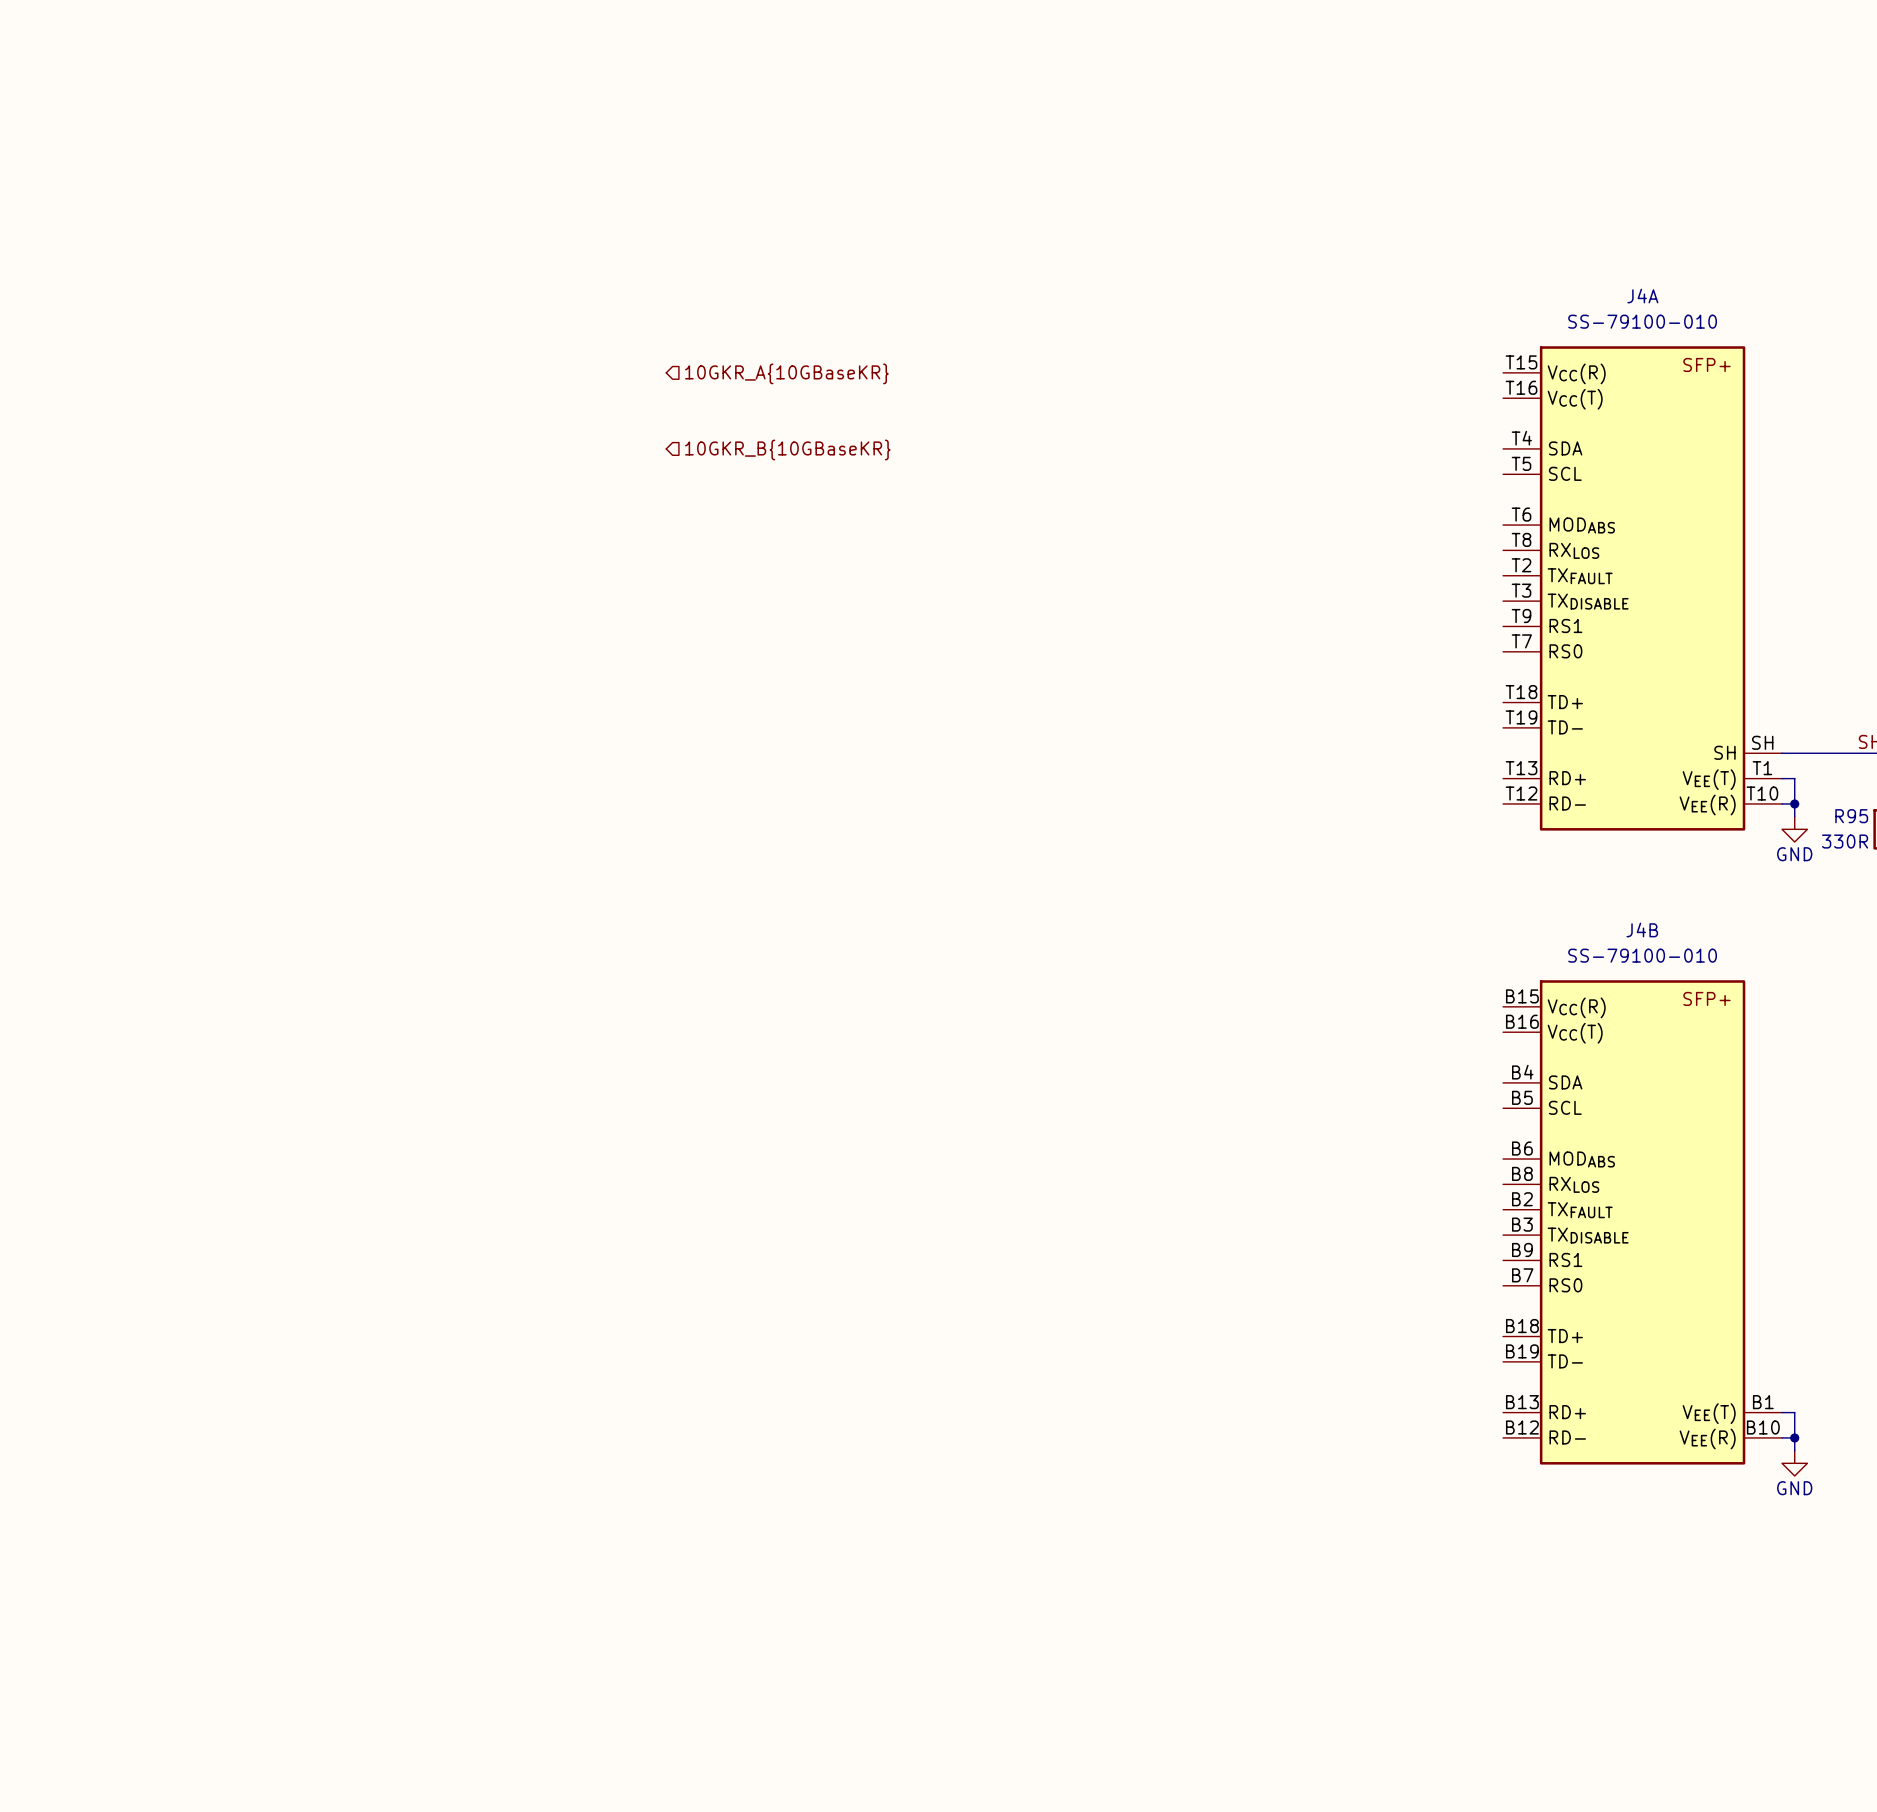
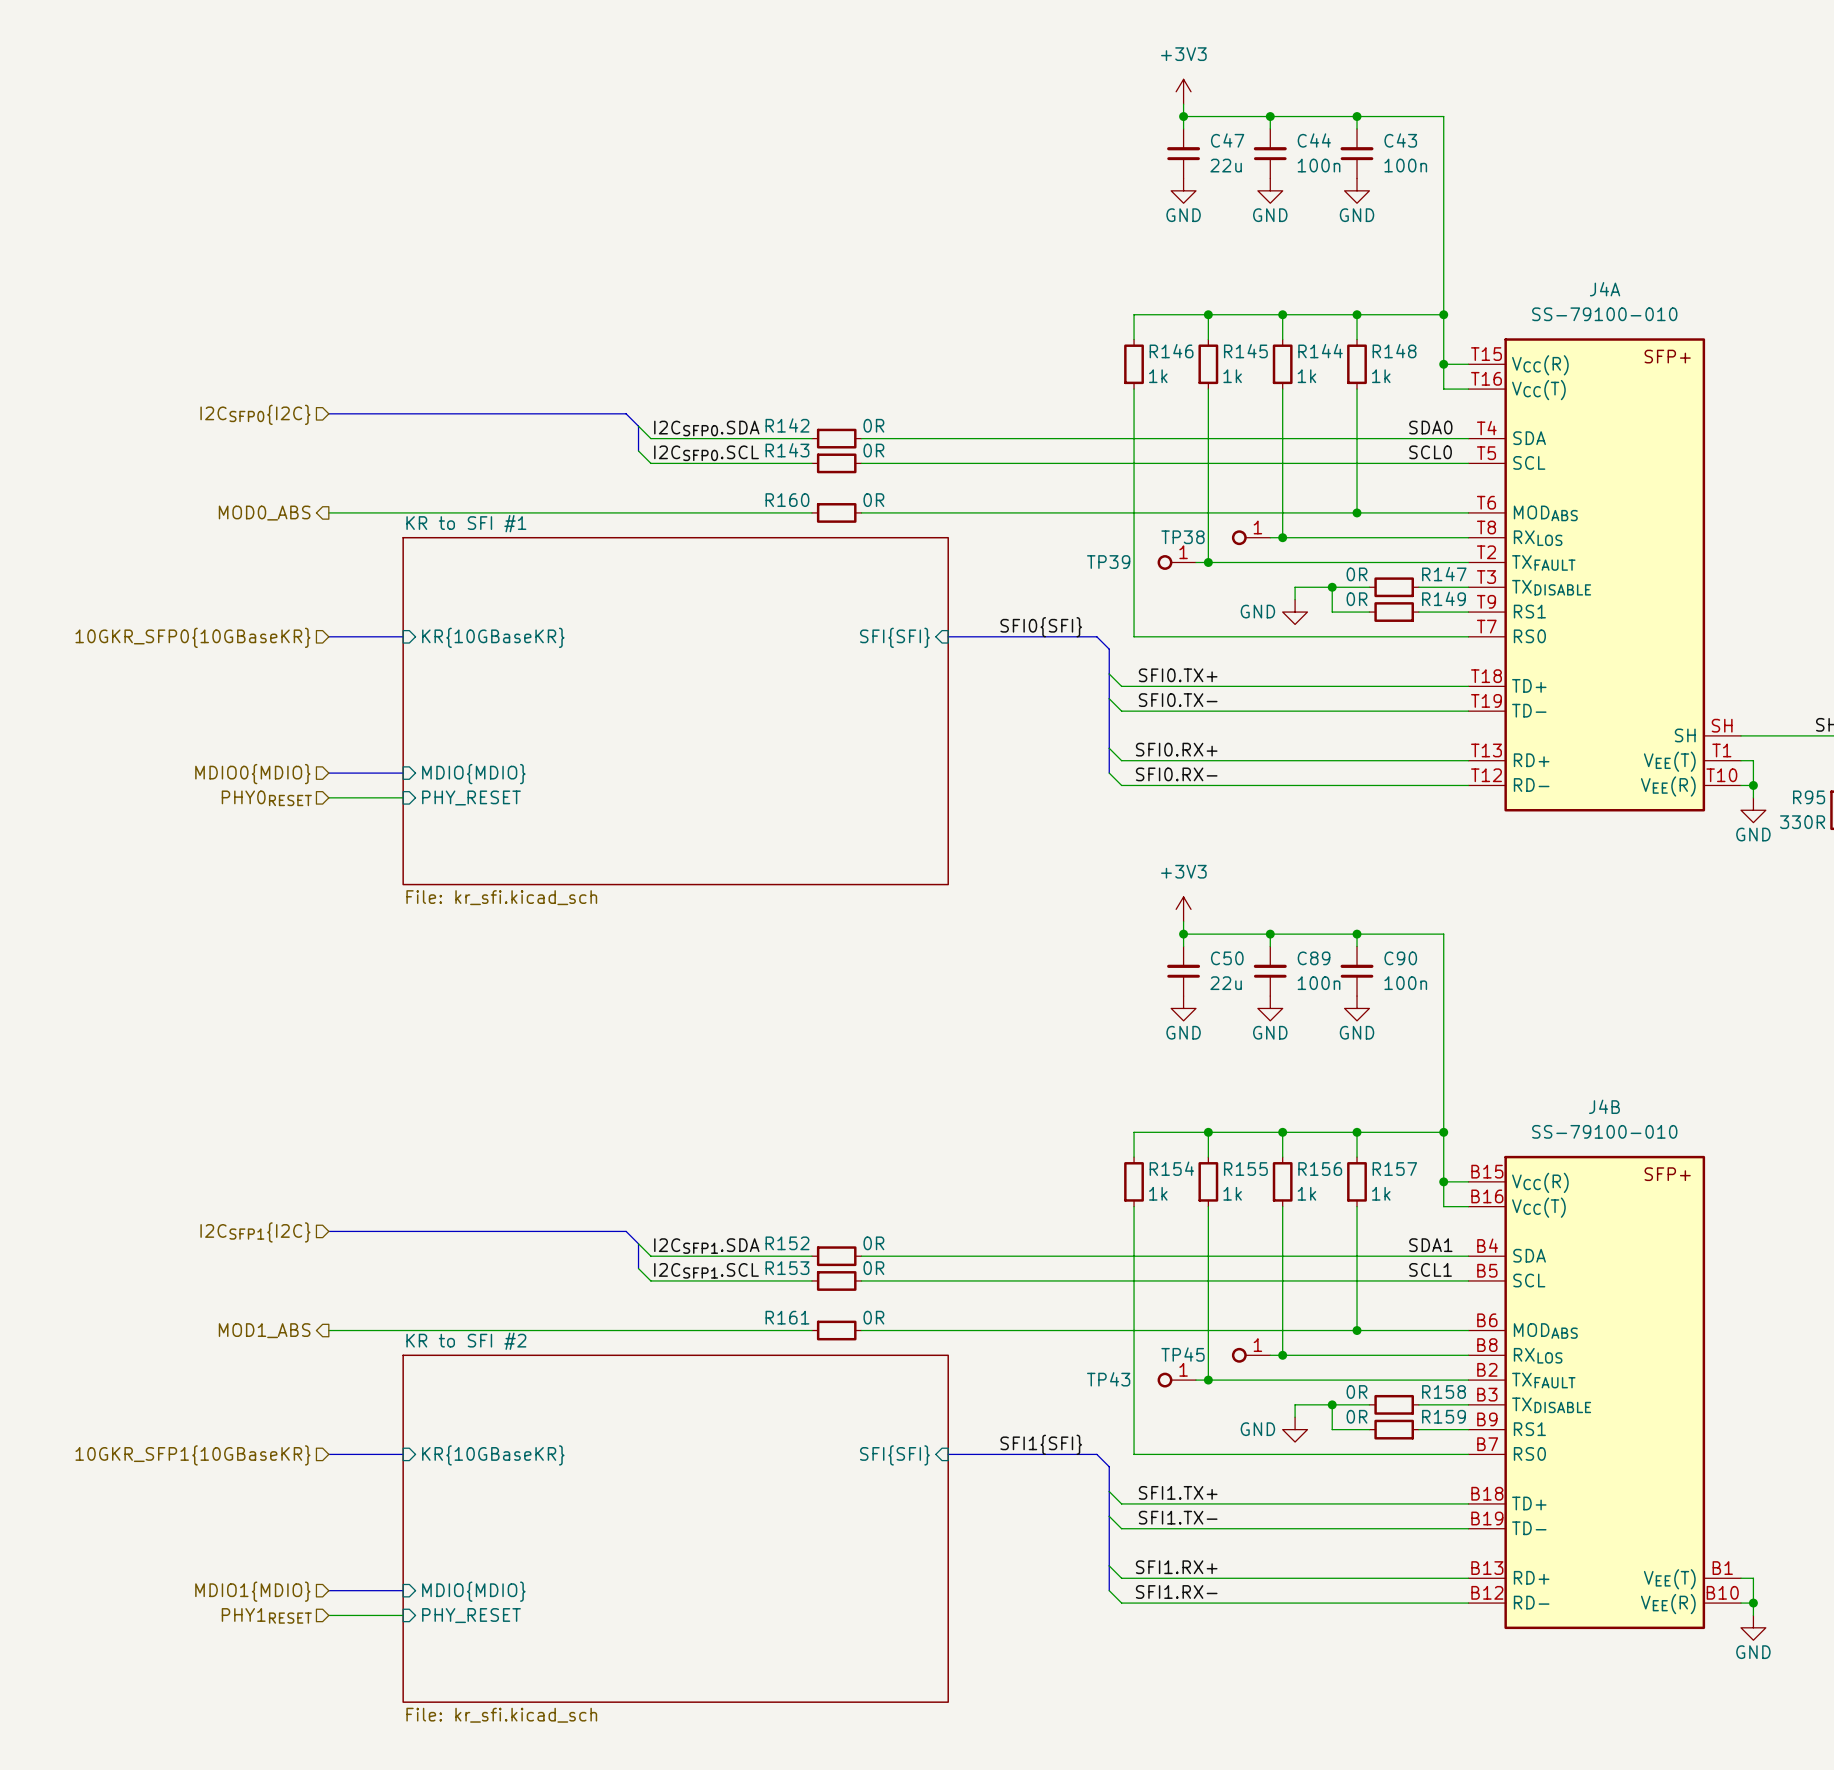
power symbol: none -> +3V3 (1183, 91)
wire: none -> (1183, 104) (1183, 128)
wire: none -> (1183, 116) (1443, 116) (1443, 389) (1468, 389)
junction: none -> (1183, 116)
wire: none -> (1270, 116) (1270, 128)
junction: none -> (1270, 116)
wire: none -> (1357, 116) (1357, 128)
junction: none -> (1357, 116)
C47: none -> (1183, 153)
C44: none -> (1270, 153)
C43: none -> (1357, 153)
power symbol: none -> GND (1183, 190)
power symbol: none -> GND (1270, 190)
power symbol: none -> GND (1357, 190)
wire: none -> (1208, 314) (1208, 339)
junction: none -> (1208, 314)
wire: none -> (1282, 314) (1282, 339)
junction: none -> (1282, 314)
wire: none -> (1357, 314) (1357, 339)
junction: none -> (1357, 314)
wire: none -> (1443, 314) (1134, 314) (1134, 339)
junction: none -> (1443, 314)
R146: none -> (1134, 364)
R145: none -> (1208, 364)
R144: none -> (1282, 364)
R148: none -> (1357, 364)
wire: none -> (1443, 364) (1468, 364)
junction: none -> (1443, 364)
hierarchical label: 10GKR_A{10GBaseKR} (786, 373) -> none
wire: none -> (1134, 389) (1134, 636) (1468, 636)
wire: none -> (1208, 389) (1208, 562)
wire: none -> (1282, 389) (1282, 537)
wire: none -> (1357, 389) (1357, 512)
bus: none -> (328, 413) (626, 413) (638, 426) (638, 451)
hierarchical label: none -> I2CSFP0{I2C} (255, 414)
wire: none -> (638, 426) (650, 438) (811, 438)
label: none -> SDA0 (1430, 427)
label: none -> I2CSFP0.SDA (706, 428)
R142: none -> (836, 438)
wire: none -> (861, 438) (1468, 438)
hierarchical label: 10GKR_B{10GBaseKR} (787, 449) -> none
wire: none -> (638, 451) (650, 463) (811, 463)
label: none -> SCL0 (1430, 452)
label: none -> I2CSFP0.SCL (706, 453)
R143: none -> (836, 463)
wire: none -> (861, 463) (1468, 463)
hierarchical label: none -> MOD0_ABS (264, 513)
wire: none -> (328, 512) (811, 512)
R160: none -> (836, 512)
wire: none -> (861, 512) (1468, 512)
junction: none -> (1357, 512)
TP38: none -> (1251, 537)
wire: none -> (1270, 537) (1468, 537)
junction: none -> (1282, 537)
TP39: none -> (1176, 562)
wire: none -> (1195, 562) (1468, 562)
junction: none -> (1208, 562)
wire: none -> (1332, 587) (1332, 612) (1369, 612)
junction: none -> (1332, 587)
wire: none -> (1369, 587) (1295, 587) (1295, 599)
R147: none -> (1394, 587)
wire: none -> (1418, 587) (1468, 587)
power symbol: none -> GND (1295, 612)
R149: none -> (1394, 612)
wire: none -> (1418, 612) (1468, 612)
label: none -> SFI0{SFI} (1041, 627)
bus: none -> (328, 636) (403, 636)
bus: none -> (948, 636) (1096, 636) (1109, 649) (1109, 773)
hierarchical label: none -> 10GKR_SFP0{10GBaseKR} (192, 637)
sheet pin: none -> KR{10GBaseKR} (493, 637)
sheet pin: none -> SFI{SFI} (894, 637)
wire: none -> (1109, 673) (1121, 686) (1468, 686)
label: none -> SFI0.TX+ (1178, 675)
wire: none -> (1109, 698) (1121, 711) (1468, 711)
label: none -> SFI0.TX- (1178, 700)
sheet KR to SFI #1: none -> File: kr_sfi.kicad_sch (675, 711)
wire: none -> (1109, 748) (1121, 760) (1468, 760)
label: none -> SFI0.RX+ (1176, 749)
bus: none -> (328, 773) (403, 773)
wire: none -> (1109, 773) (1121, 785) (1468, 785)
hierarchical label: none -> MDIO0{MDIO} (252, 774)
sheet pin: none -> MDIO{MDIO} (473, 774)
label: none -> SFI0.RX- (1176, 774)
wire: none -> (328, 797) (403, 797)
sheet pin: none -> PHY_RESET (471, 797)
hierarchical label: none -> PHY0RESET (266, 798)
power symbol: none -> +3V3 (1183, 909)
wire: none -> (1183, 921) (1183, 946)
wire: none -> (1183, 934) (1443, 934) (1443, 1206) (1468, 1206)
junction: none -> (1183, 934)
wire: none -> (1270, 934) (1270, 946)
junction: none -> (1270, 934)
wire: none -> (1357, 934) (1357, 946)
junction: none -> (1357, 934)
C50: none -> (1183, 971)
C89: none -> (1270, 971)
C90: none -> (1357, 971)
power symbol: none -> GND (1183, 1008)
power symbol: none -> GND (1270, 1008)
power symbol: none -> GND (1357, 1008)
wire: none -> (1208, 1132) (1208, 1157)
junction: none -> (1208, 1132)
wire: none -> (1282, 1132) (1282, 1157)
junction: none -> (1282, 1132)
wire: none -> (1357, 1132) (1357, 1157)
junction: none -> (1357, 1132)
wire: none -> (1443, 1132) (1134, 1132) (1134, 1157)
junction: none -> (1443, 1132)
R154: none -> (1134, 1181)
R155: none -> (1208, 1181)
R156: none -> (1282, 1181)
R157: none -> (1357, 1181)
wire: none -> (1443, 1181) (1468, 1181)
junction: none -> (1443, 1181)
J4B position: (1642, 1222) -> (1604, 1392)
wire: none -> (1134, 1206) (1134, 1454) (1468, 1454)
wire: none -> (1208, 1206) (1208, 1380)
wire: none -> (1282, 1206) (1282, 1355)
wire: none -> (1357, 1206) (1357, 1330)
bus: none -> (328, 1231) (626, 1231) (638, 1243) (638, 1268)
hierarchical label: none -> I2CSFP1{I2C} (255, 1232)
wire: none -> (638, 1243) (650, 1256) (811, 1256)
label: none -> SDA1 (1430, 1245)
label: none -> I2CSFP1.SDA (706, 1246)
R152: none -> (836, 1256)
wire: none -> (861, 1256) (1468, 1256)
wire: none -> (638, 1268) (650, 1280) (811, 1280)
label: none -> SCL1 (1430, 1269)
label: none -> I2CSFP1.SCL (706, 1270)
R153: none -> (836, 1280)
wire: none -> (861, 1280) (1468, 1280)
wire: none -> (328, 1330) (811, 1330)
R161: none -> (836, 1330)
wire: none -> (861, 1330) (1468, 1330)
junction: none -> (1357, 1330)
hierarchical label: none -> MOD1_ABS (264, 1330)
TP45: none -> (1251, 1355)
wire: none -> (1270, 1355) (1468, 1355)
junction: none -> (1282, 1355)
TP43: none -> (1176, 1380)
wire: none -> (1195, 1380) (1468, 1380)
junction: none -> (1208, 1380)
wire: (1782, 1412) (1794, 1412) (1794, 1450) -> (1741, 1578) (1753, 1578) (1753, 1615)
wire: none -> (1332, 1404) (1332, 1429) (1369, 1429)
junction: none -> (1332, 1404)
wire: none -> (1369, 1404) (1295, 1404) (1295, 1417)
R158: none -> (1394, 1404)
wire: none -> (1418, 1404) (1468, 1404)
wire: (1782, 1437) (1794, 1437) -> (1741, 1603) (1753, 1603)
junction: (1794, 1437) -> none
power symbol: none -> GND (1295, 1429)
R159: none -> (1394, 1429)
wire: none -> (1418, 1429) (1468, 1429)
power symbol position: GND (1794, 1463) -> GND (1753, 1627)
label: none -> SFI1{SFI} (1041, 1444)
bus: none -> (328, 1454) (403, 1454)
bus: none -> (948, 1454) (1096, 1454) (1109, 1466) (1109, 1590)
hierarchical label: none -> 10GKR_SFP1{10GBaseKR} (192, 1455)
sheet pin: none -> KR{10GBaseKR} (493, 1455)
sheet pin: none -> SFI{SFI} (894, 1455)
wire: none -> (1109, 1491) (1121, 1503) (1468, 1503)
label: none -> SFI1.TX+ (1178, 1492)
wire: none -> (1109, 1516) (1121, 1528) (1468, 1528)
label: none -> SFI1.TX- (1178, 1517)
sheet KR to SFI #2: none -> File: kr_sfi.kicad_sch (675, 1528)
wire: none -> (1109, 1565) (1121, 1578) (1468, 1578)
label: none -> SFI1.RX+ (1176, 1567)
bus: none -> (328, 1590) (403, 1590)
wire: none -> (1109, 1590) (1121, 1603) (1468, 1603)
hierarchical label: none -> MDIO1{MDIO} (252, 1591)
sheet pin: none -> MDIO{MDIO} (473, 1591)
label: none -> SFI1.RX- (1176, 1592)
junction: none -> (1753, 1603)
hierarchical label: none -> PHY1RESET (266, 1615)
wire: none -> (328, 1615) (403, 1615)
sheet pin: none -> PHY_RESET (471, 1615)

